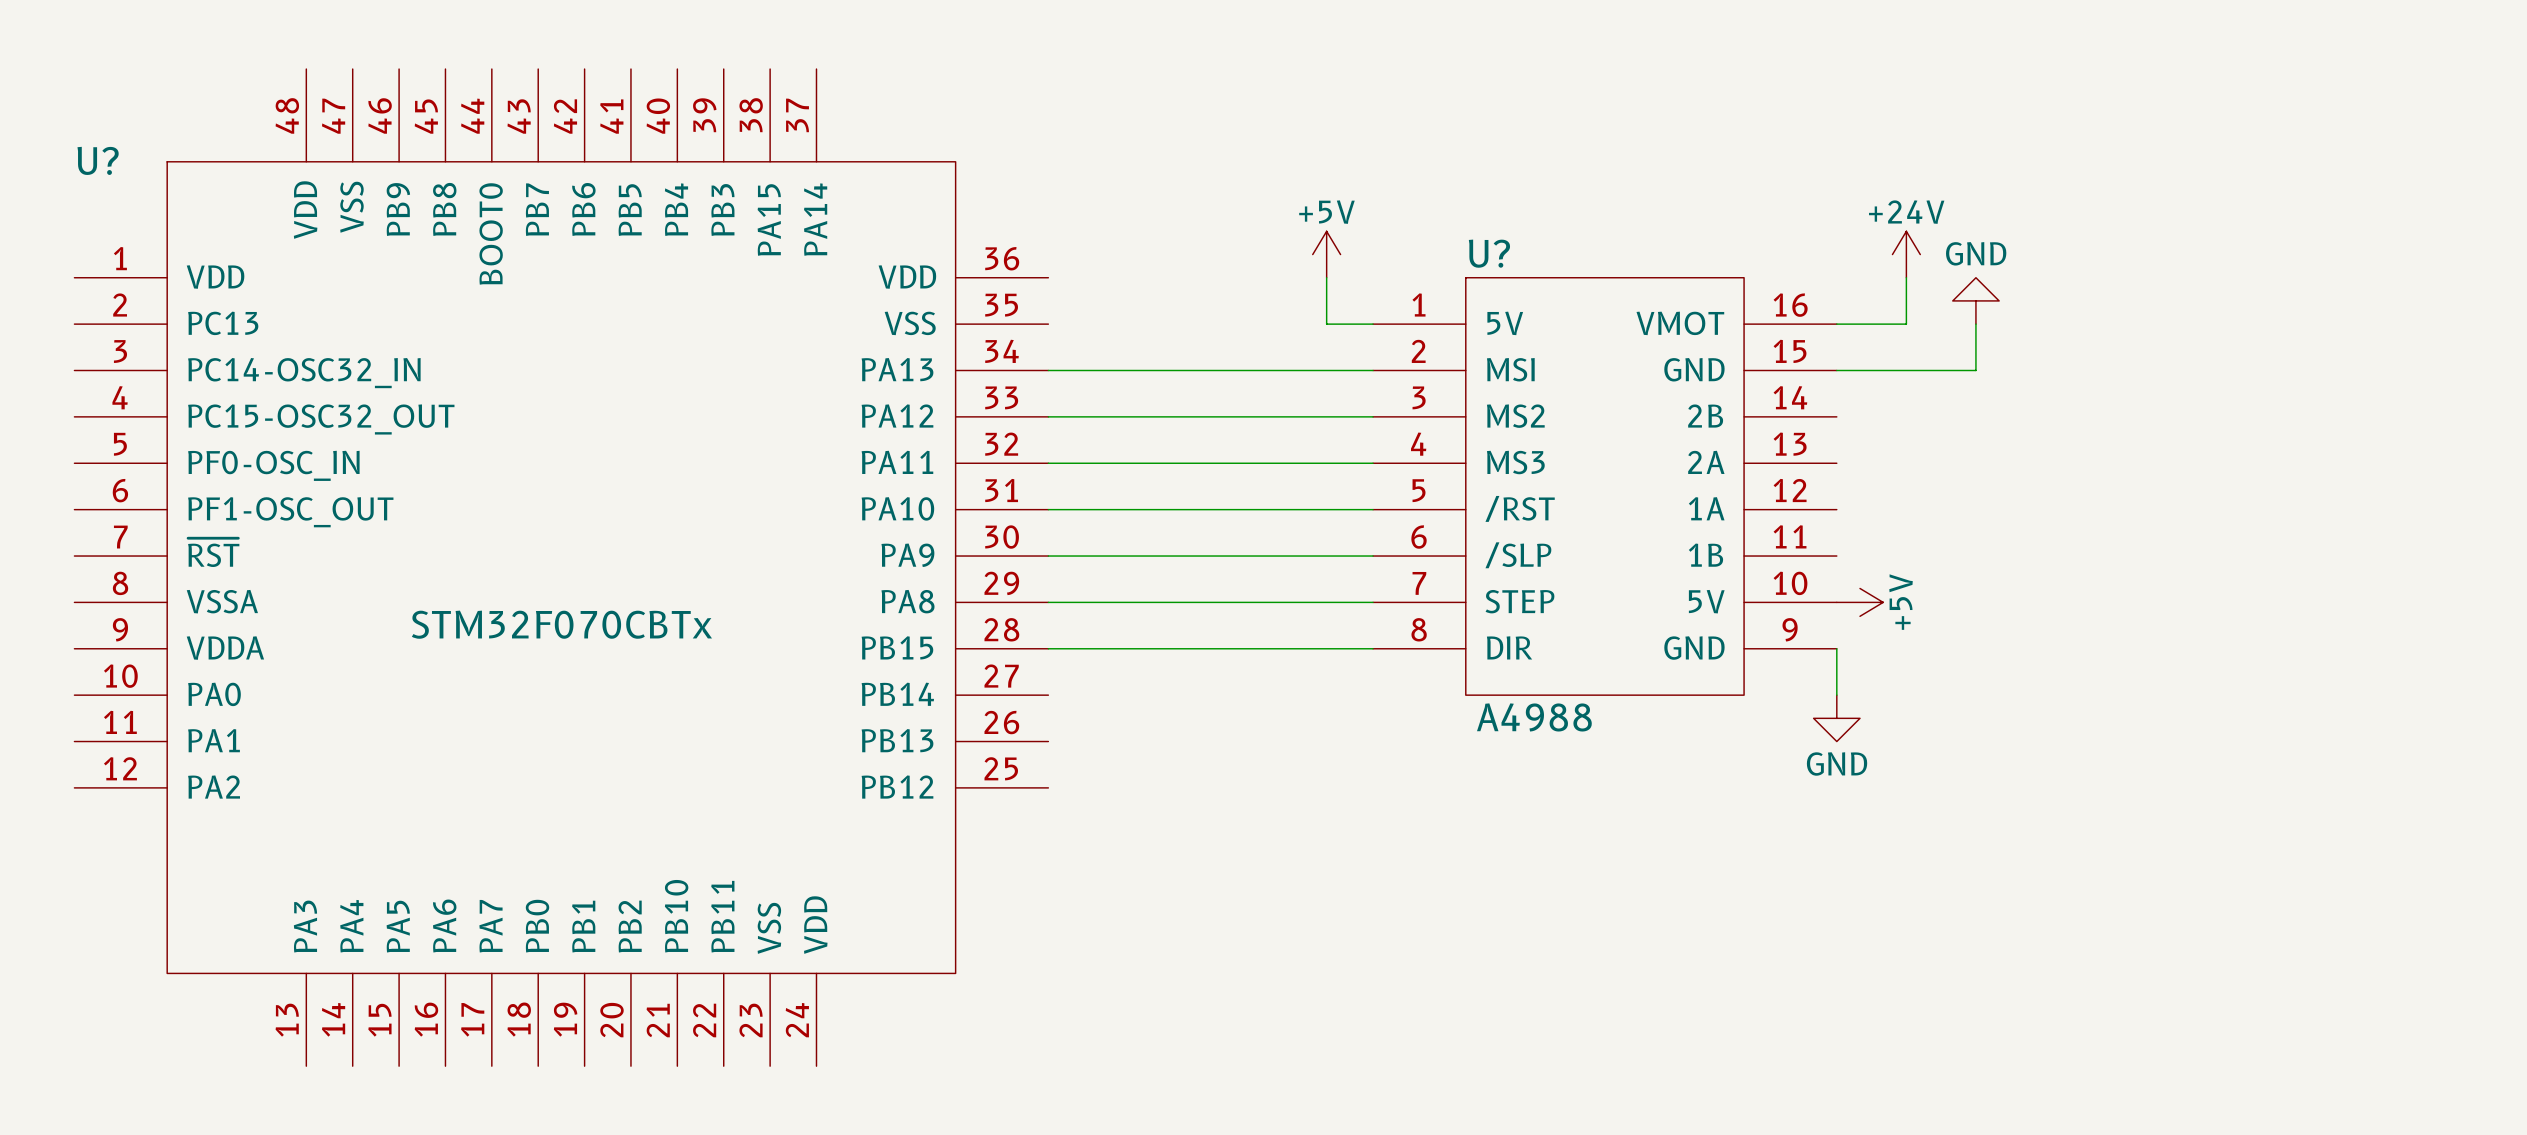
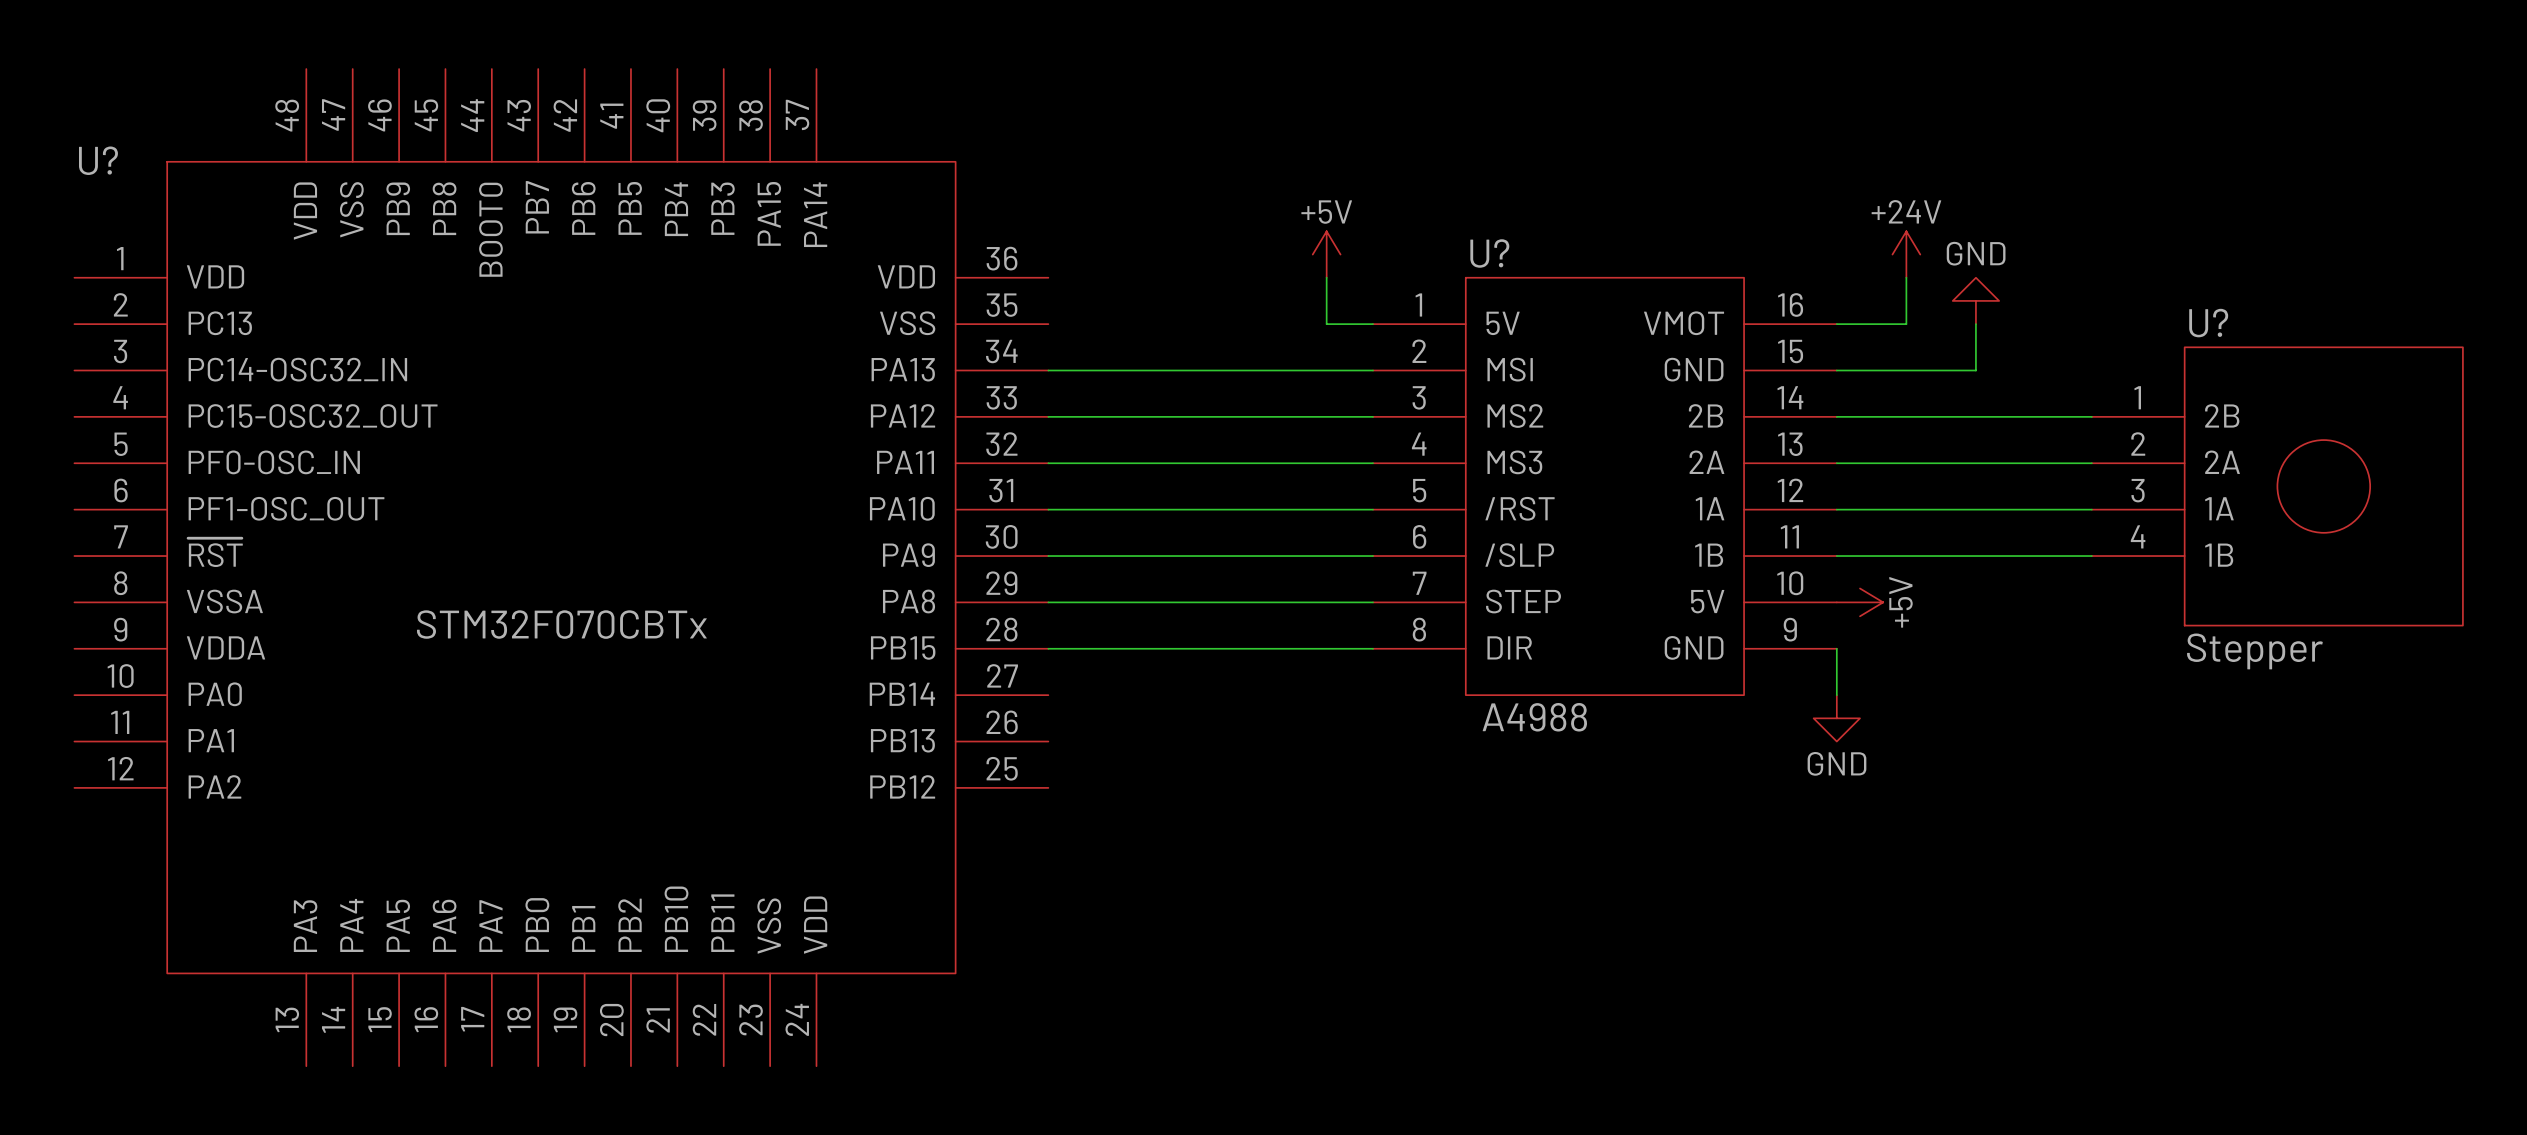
wire: none -> (1836, 416) (2091, 416)
wire: none -> (1836, 463) (2091, 463)
U?: none -> Stepper (2277, 486)
wire: none -> (1836, 509) (2091, 509)
wire: none -> (1836, 556) (2091, 556)

